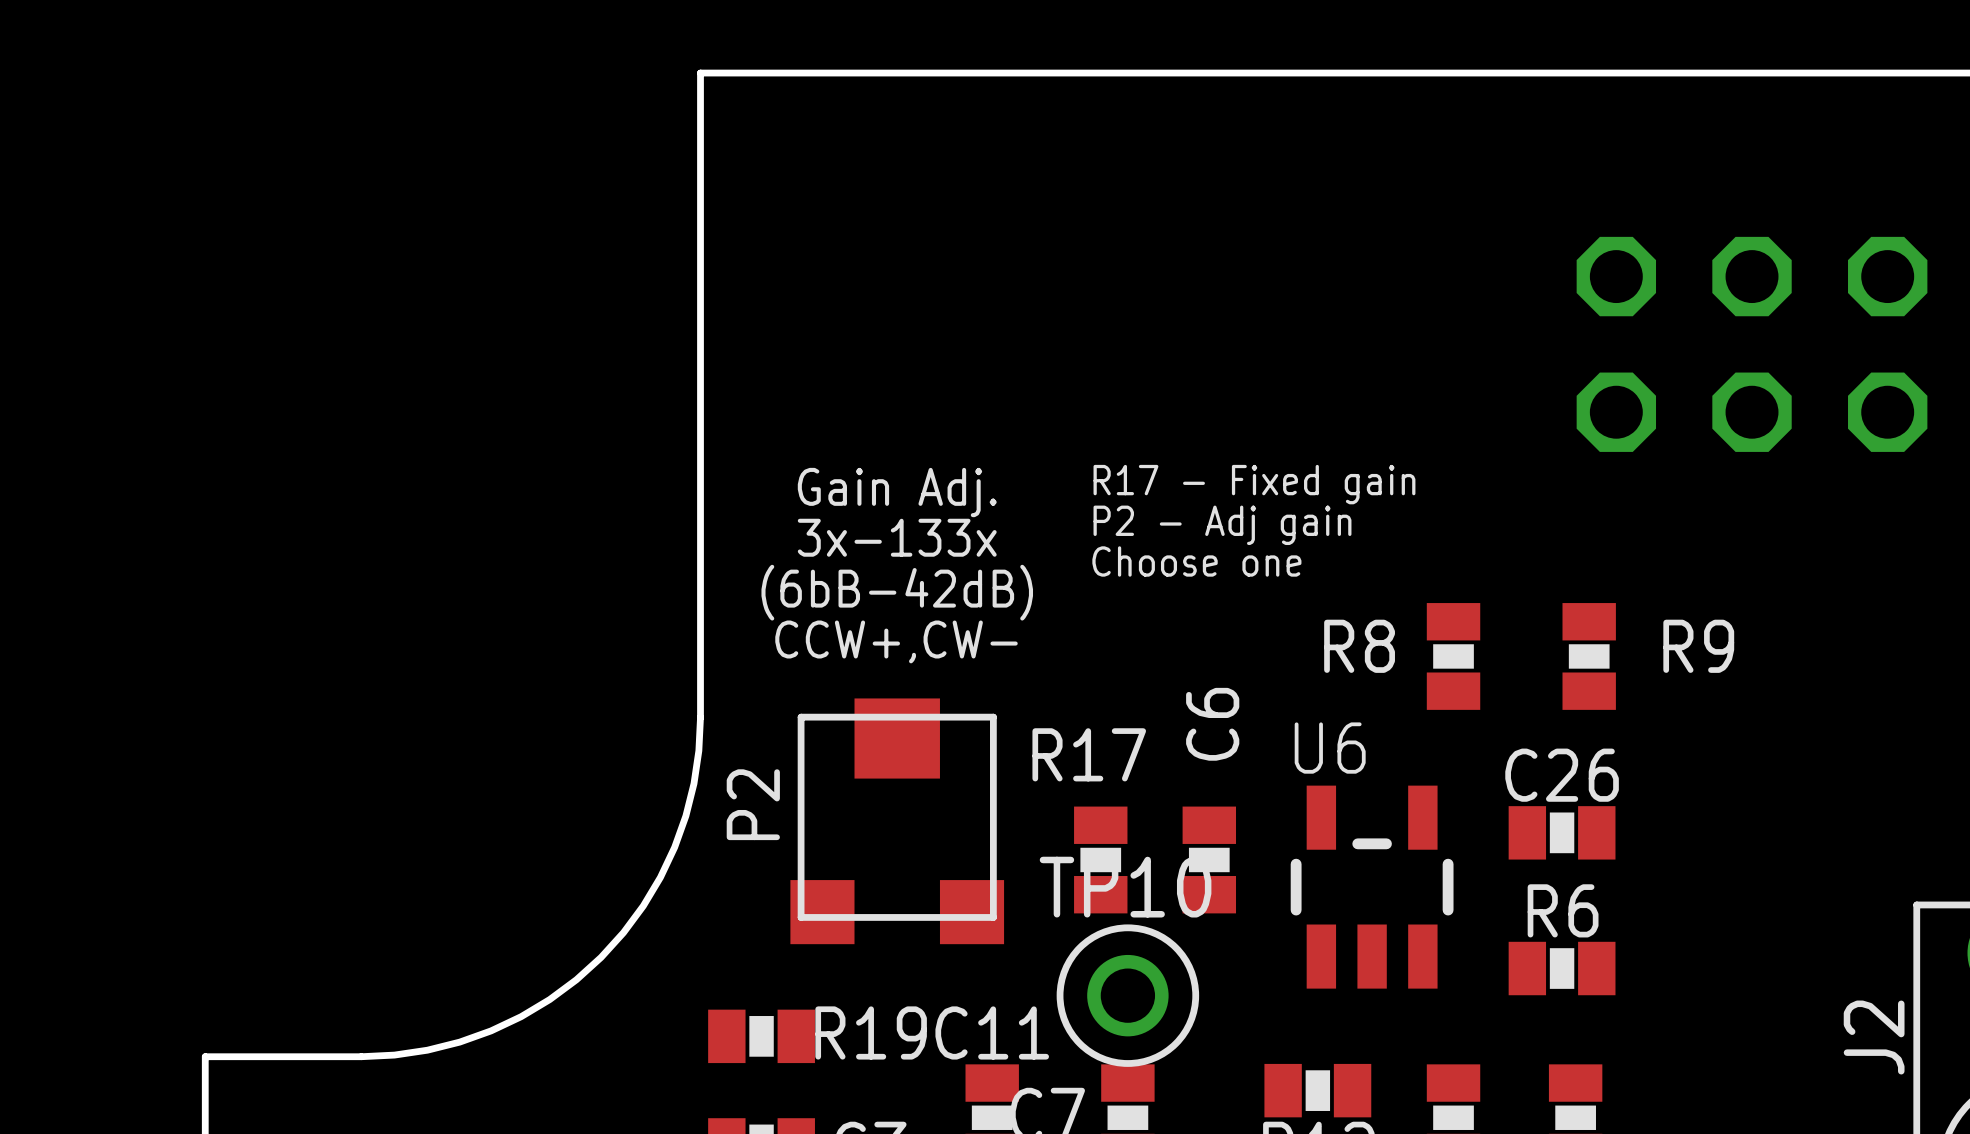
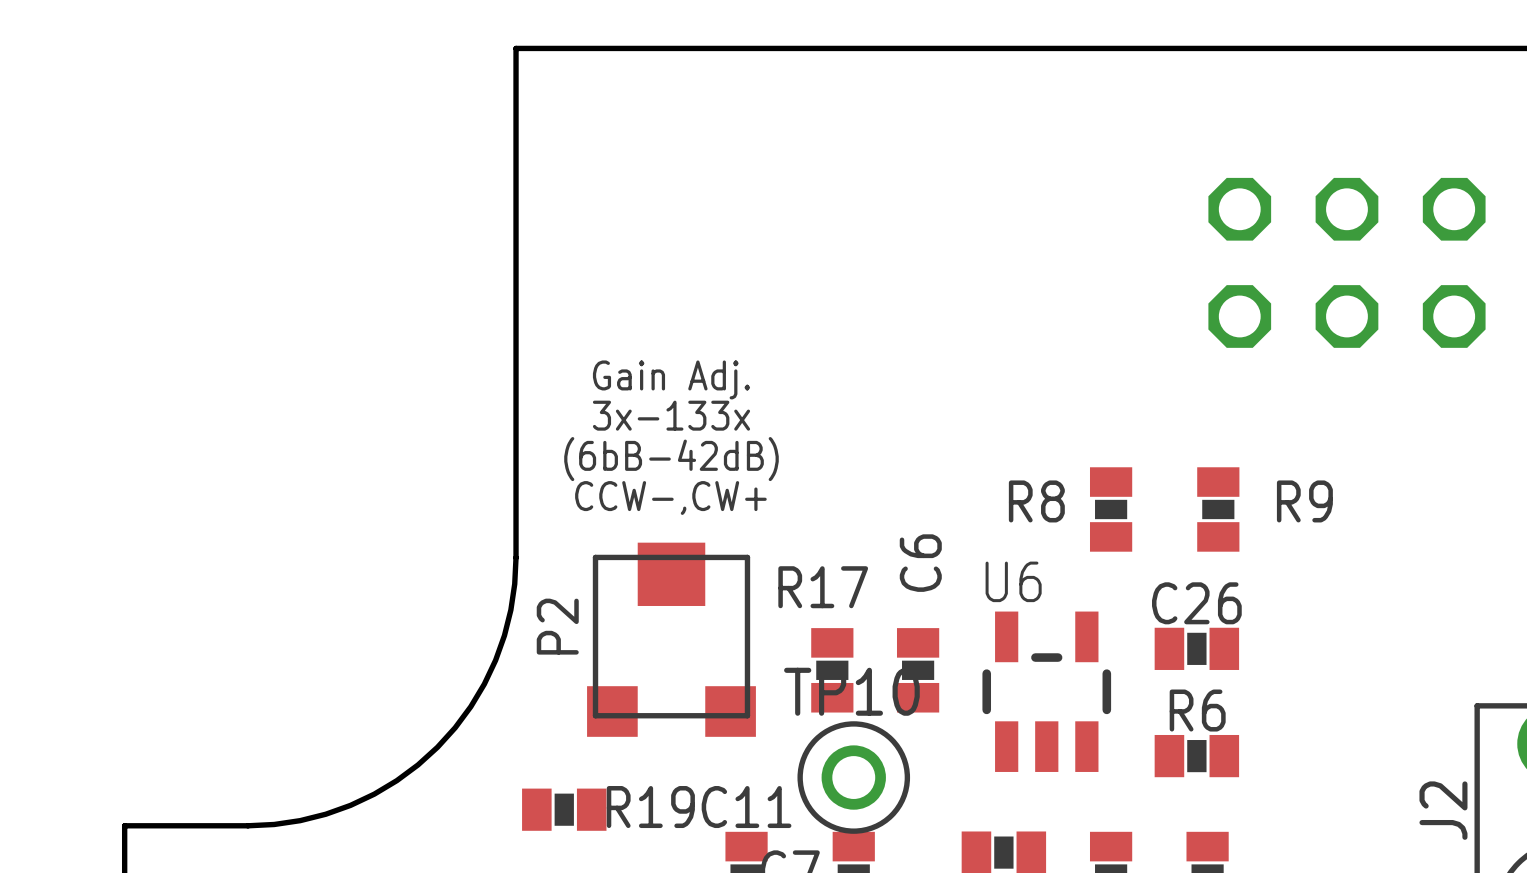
text: R17 - Fixed gain (1254, 484) -> none
text: P2 - Adj gain (1222, 525) -> none
text: Choose one (1196, 561) -> none
text: CCW+,CW- (896, 641) -> CCW-,CW+ (670, 497)

